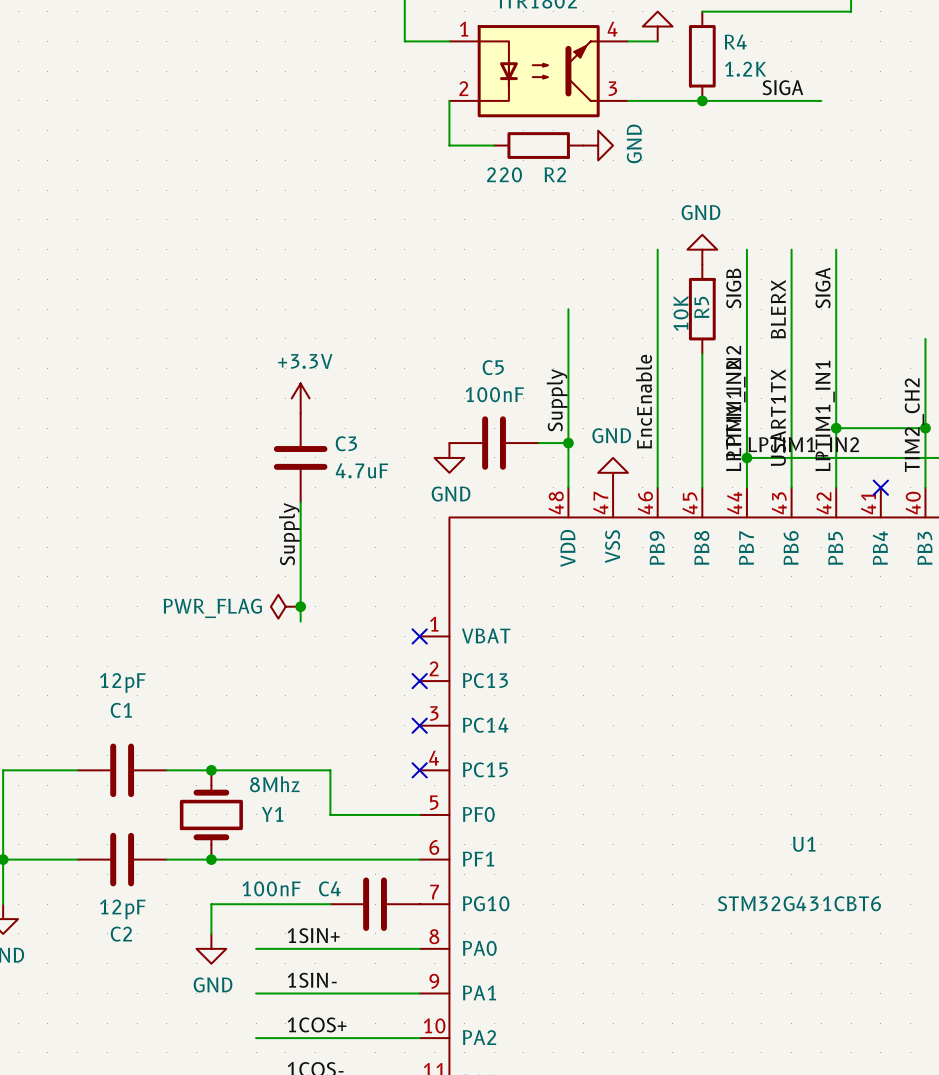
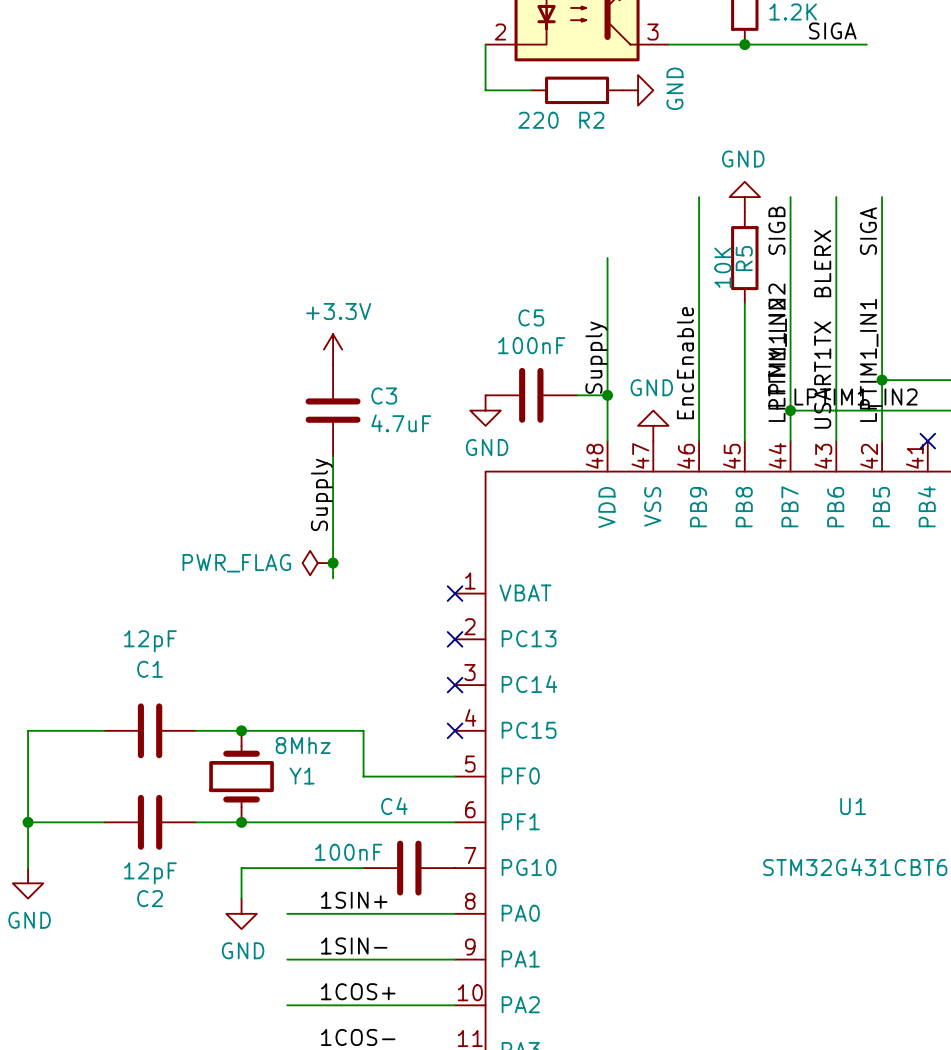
C4 value position: 100nF (271, 888) -> 100nF (348, 852)
C4 name position: C4 (329, 888) -> C4 (394, 806)

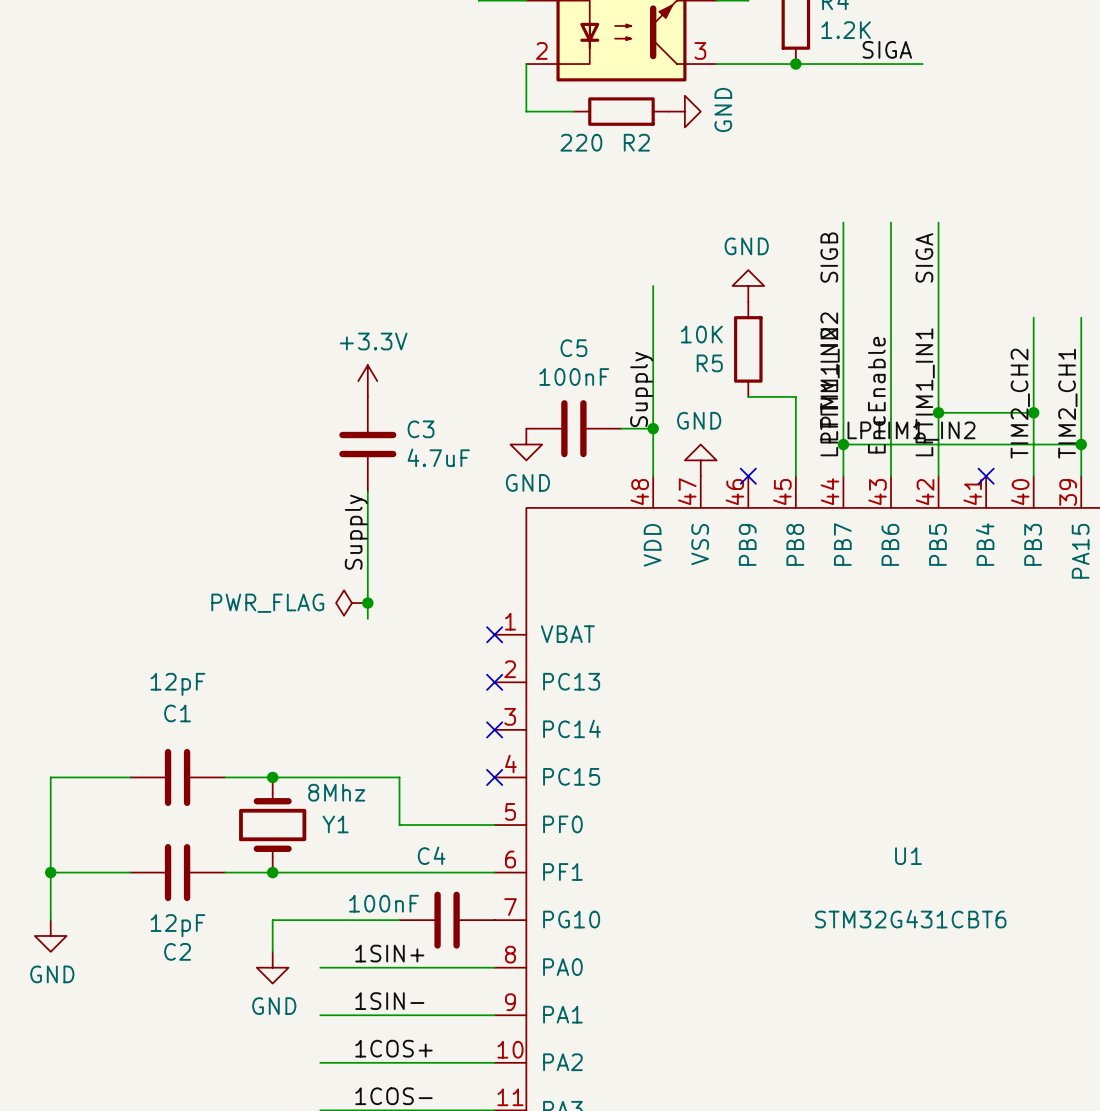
wire: (699, 197) (699, 441) -> none
power symbol position: GND (744, 197) -> GND (748, 285)
R5 position: (744, 258) -> (748, 349)
R5 name rotation: 0° (744, 258) -> 90° clockwise (709, 363)
R5 name position: R5 (744, 258) -> R5 (709, 363)
label: BLERX (822, 263) -> none
R5 value rotation: 0° (722, 267) -> 90° clockwise (701, 334)
wire: (744, 303) (744, 364) -> (748, 396) (795, 396)
label position: EncEnable (685, 363) -> EncEnable (876, 395)
label: USART1TX (822, 375) -> none
no-connect mark: none -> (748, 476)

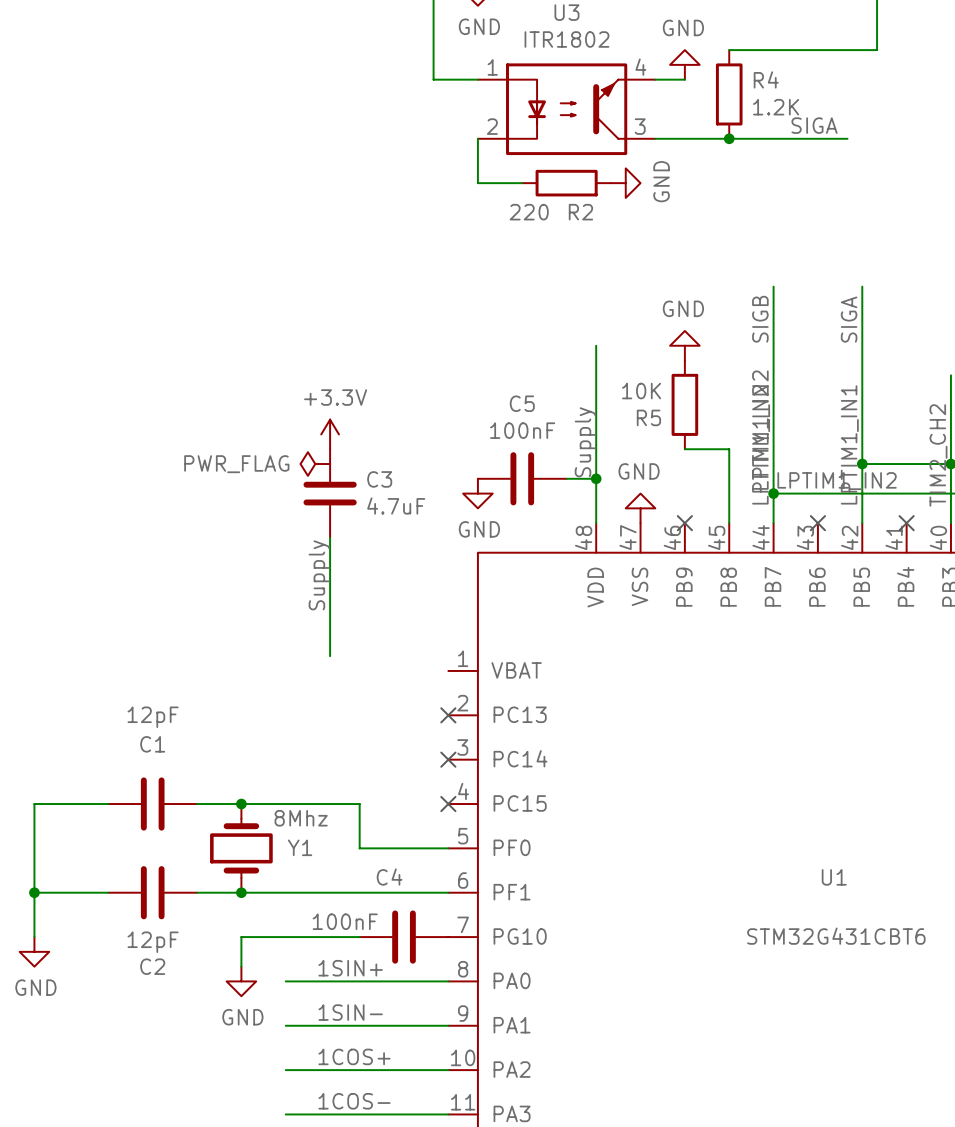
wire: (890, 222) (890, 476) -> none
label: EncEnable (876, 395) -> none
no-connect mark: none -> (817, 523)
power symbol position: PWR_FLAG (351, 603) -> PWR_FLAG (315, 464)
junction: (367, 603) -> none
no-connect mark: (494, 634) -> none

